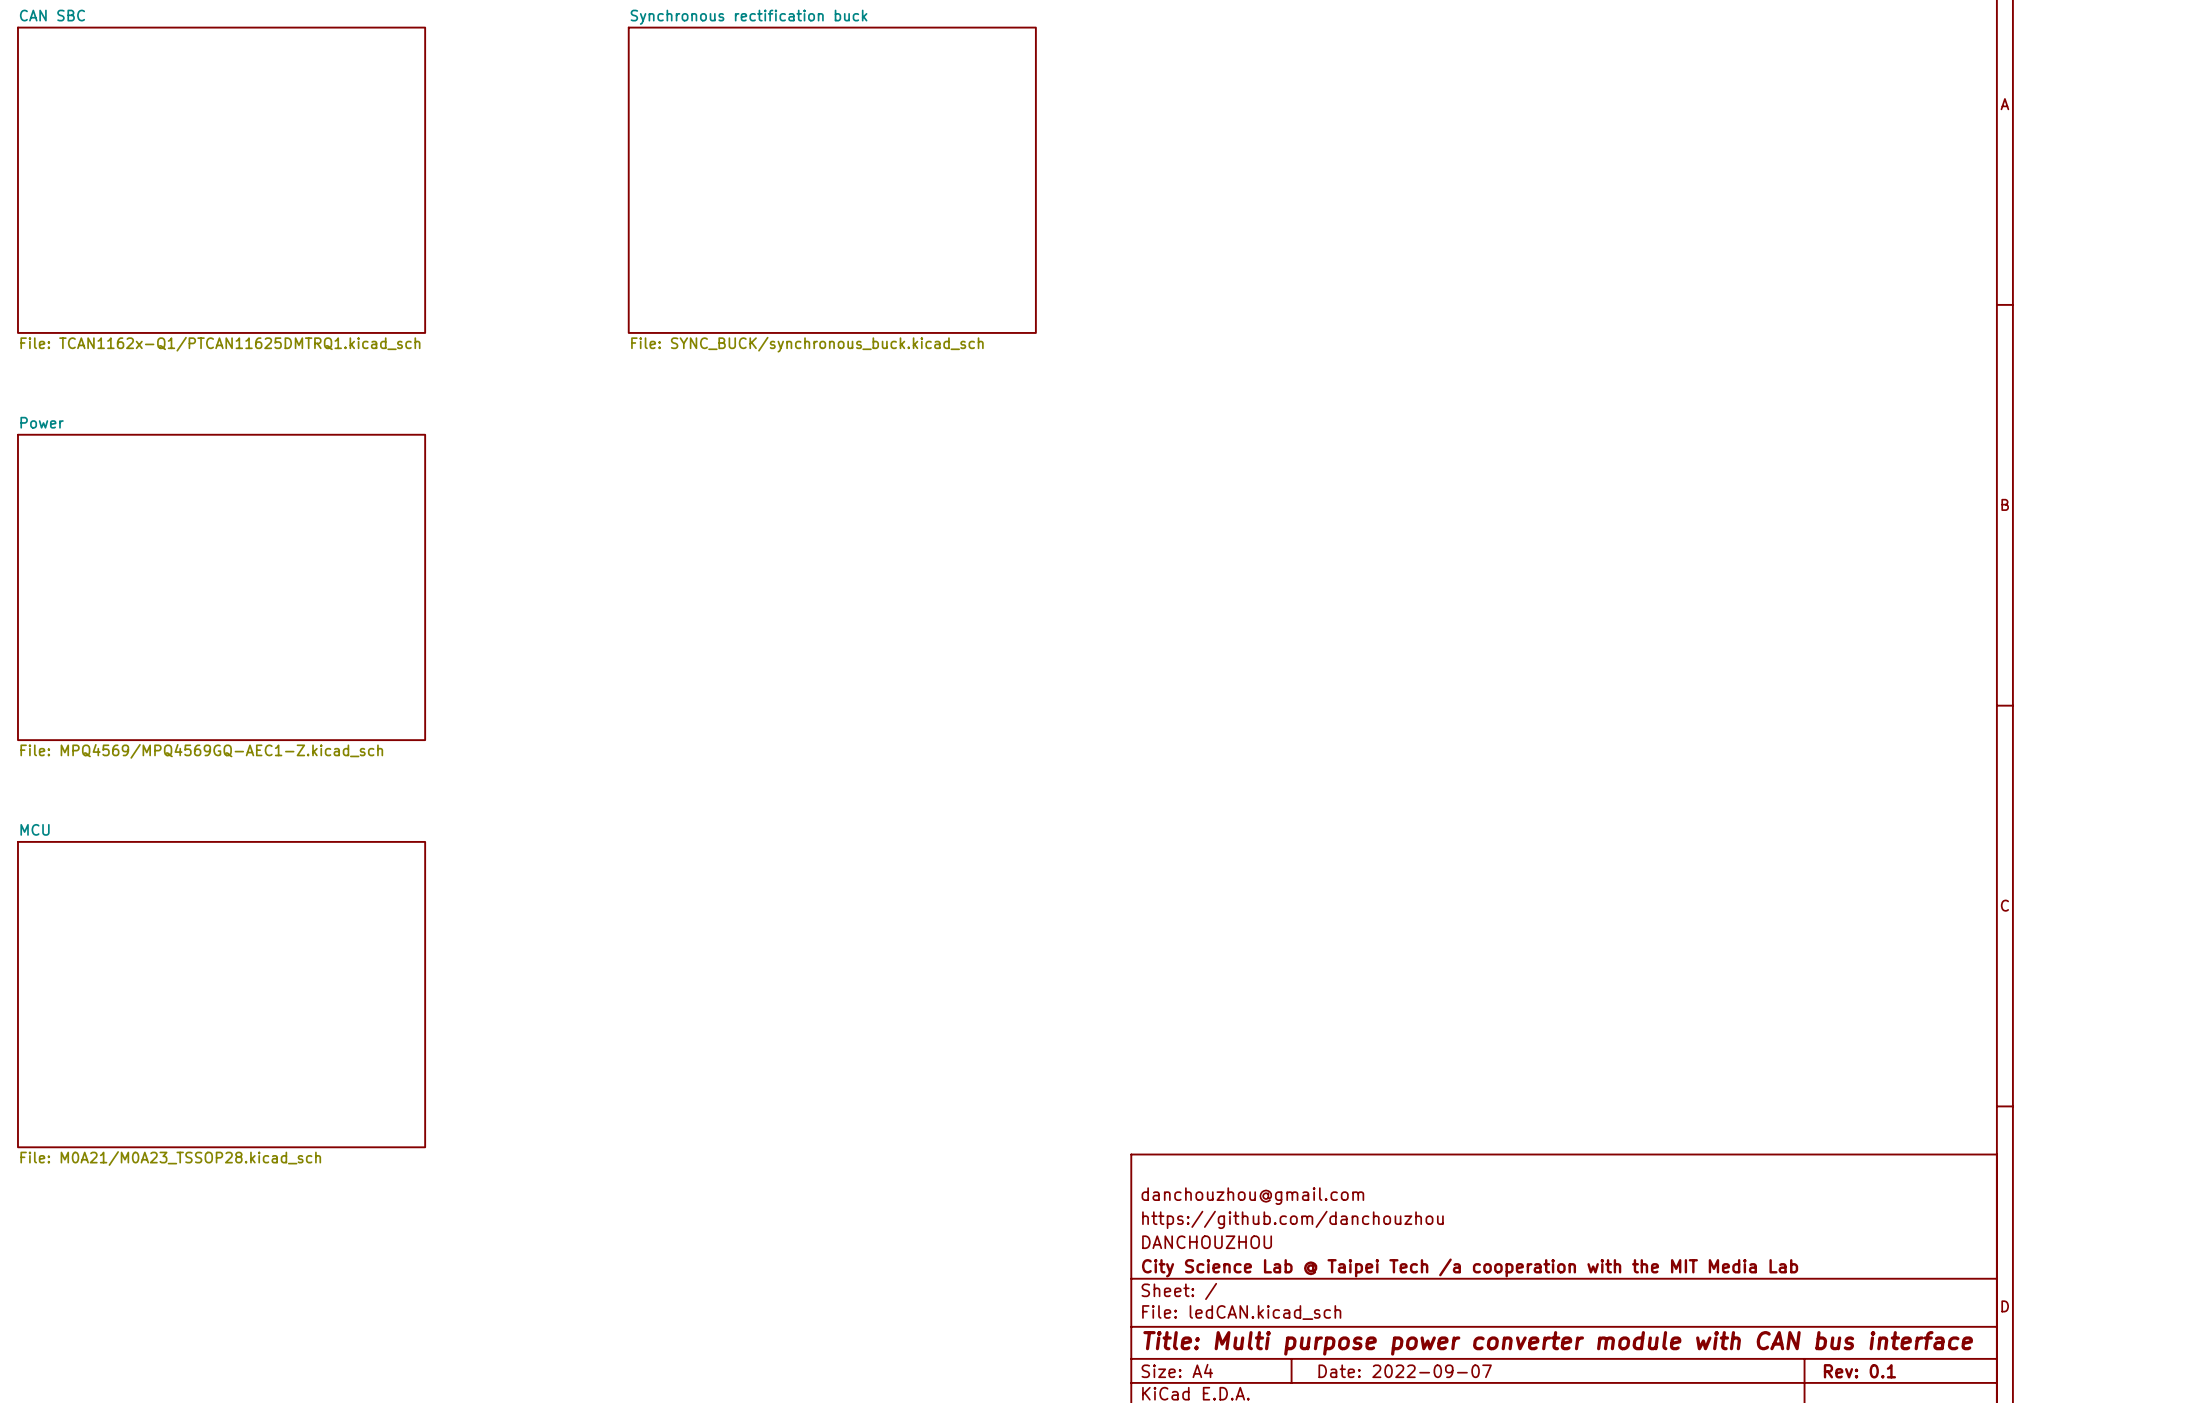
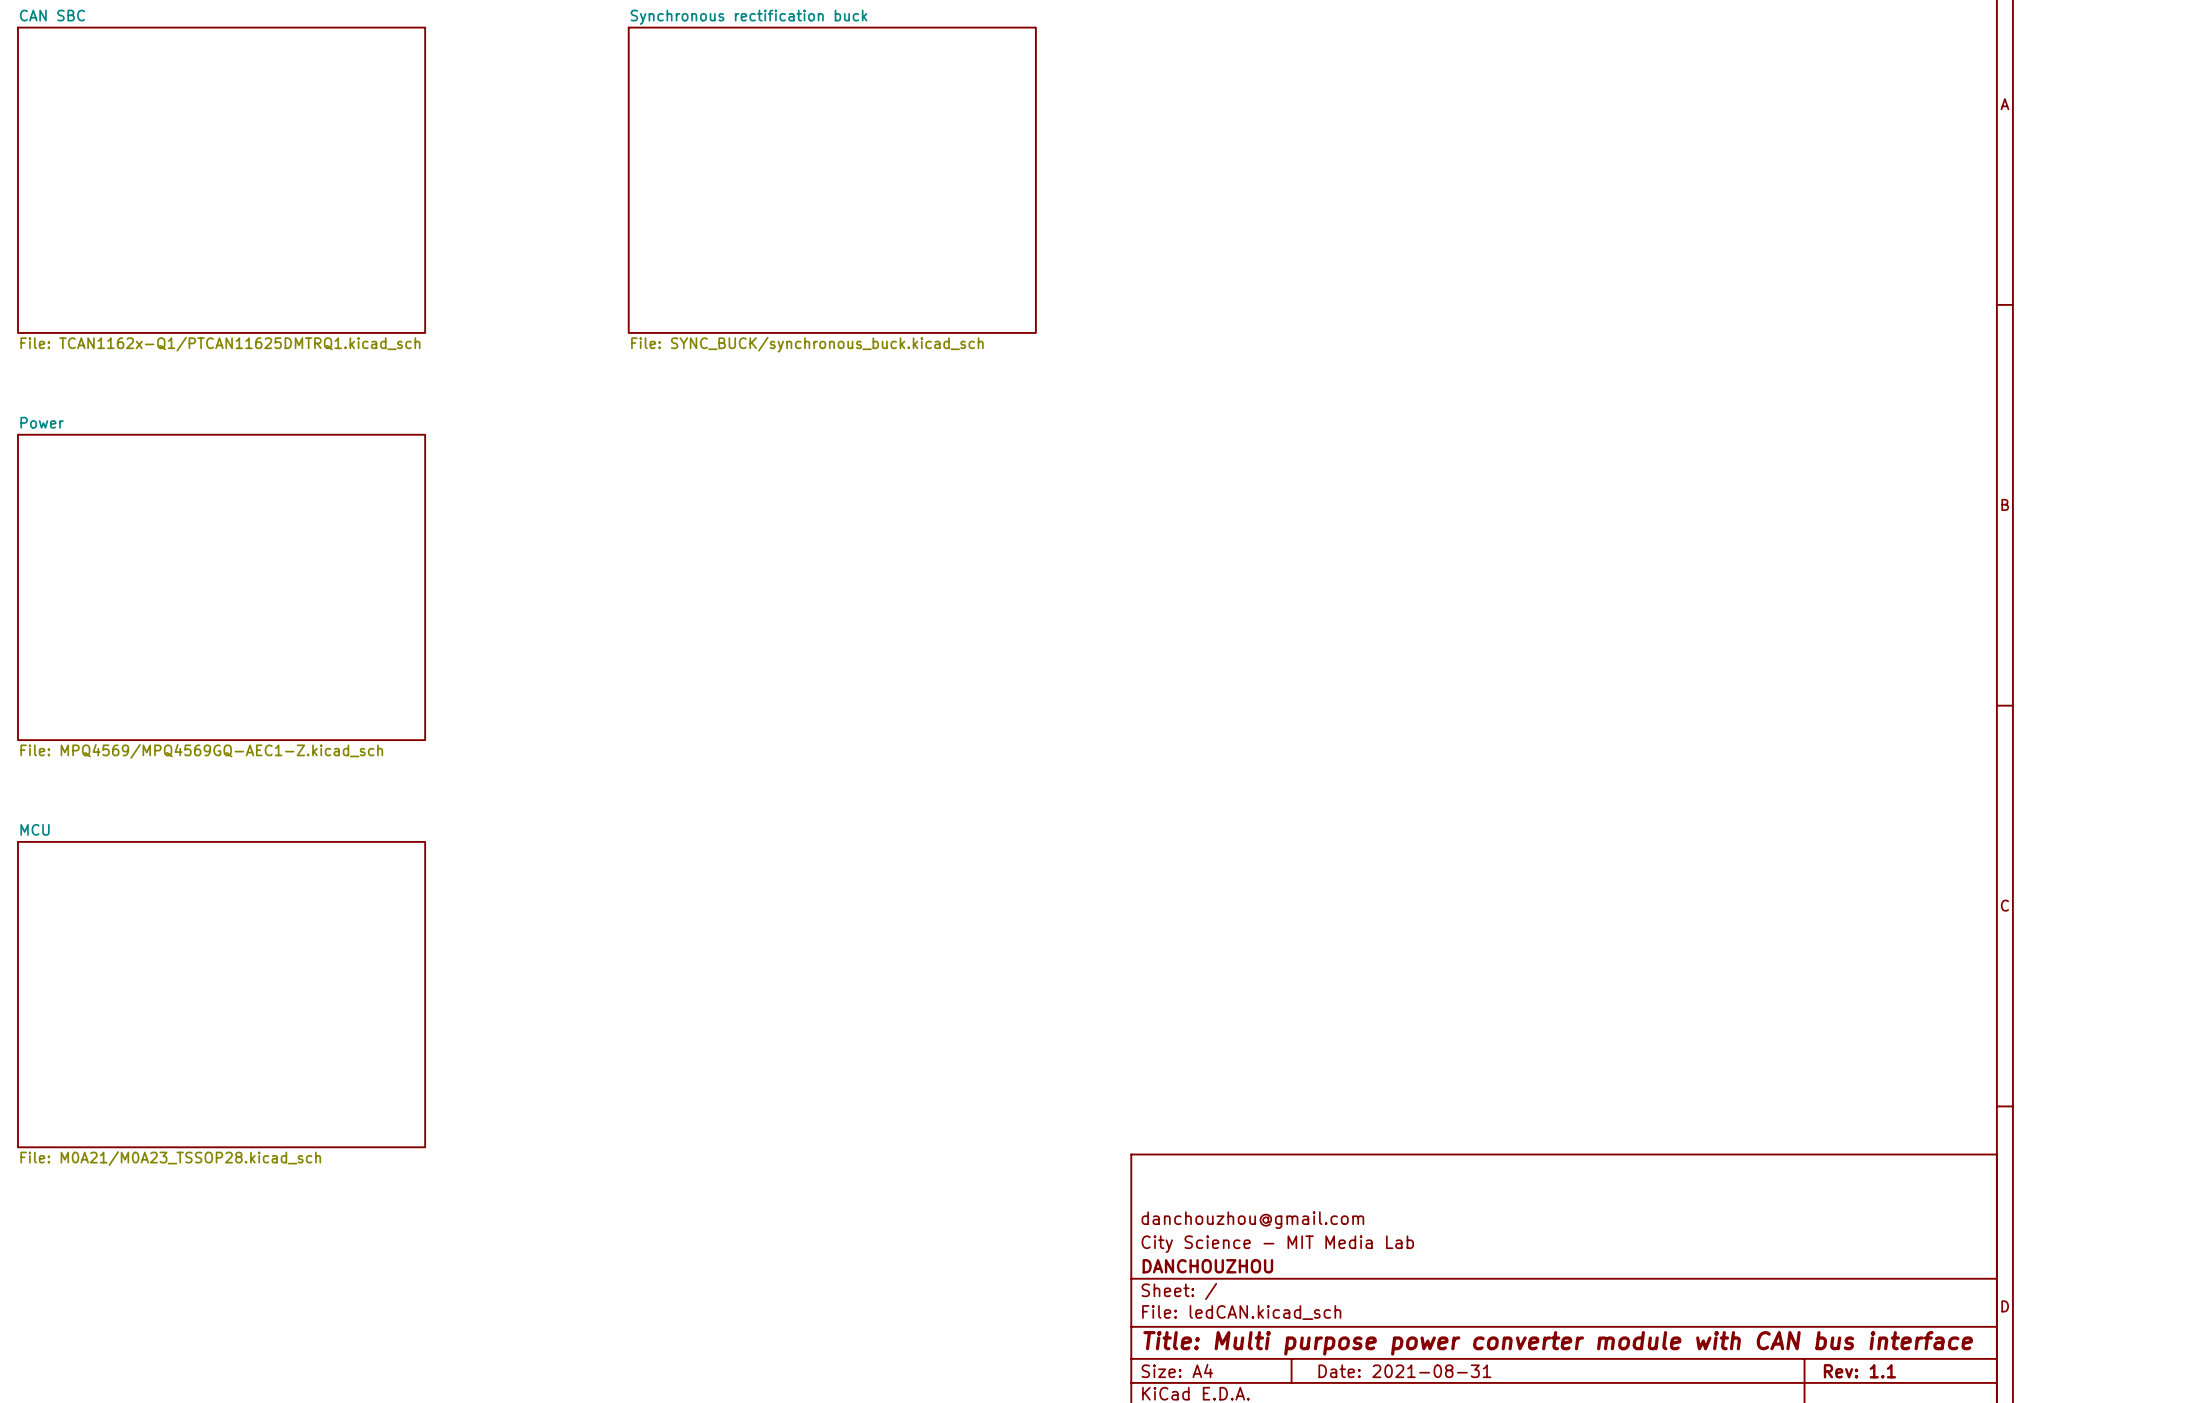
title block: danchouzhou@gmail.com (1252, 1196) -> none
title block: https://github.com/danchouzhou (1292, 1219) -> danchouzhou@gmail.com (1252, 1220)
title block: DANCHOUZHOU (1207, 1242) -> City Science - MIT Media Lab (1277, 1244)
title block: City Science Lab @ Taipei Tech /a cooperation with the MIT Media Lab (1470, 1267) -> DANCHOUZHOU (1207, 1266)
title block: Date: 2022-09-07 (1405, 1371) -> Date: 2021-08-31 (1404, 1371)
title block: Rev: 0.1 (1859, 1371) -> Rev: 1.1 (1859, 1371)

